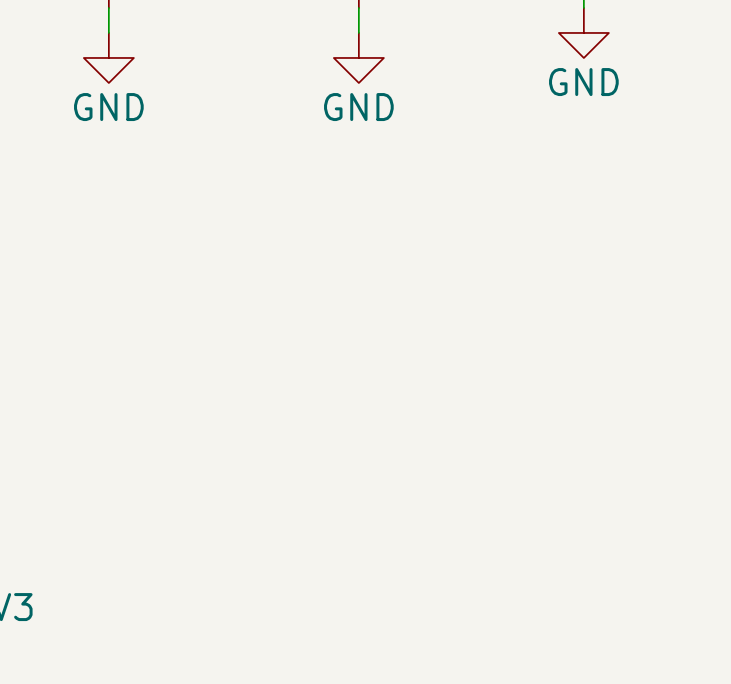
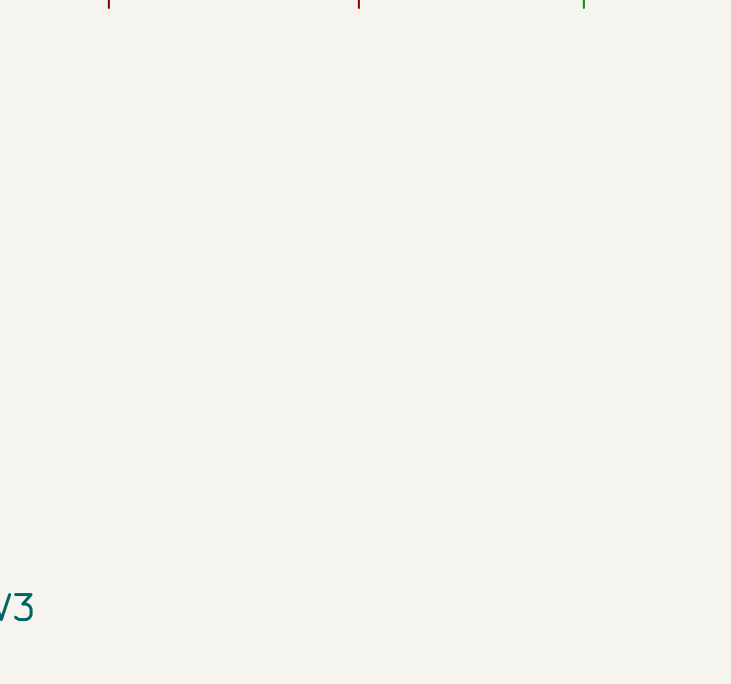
wire: (108, 7) (108, 32) -> none
wire: (358, 7) (358, 32) -> none
power symbol: GND (583, 32) -> none
power symbol: GND (108, 57) -> none
power symbol: GND (358, 57) -> none

